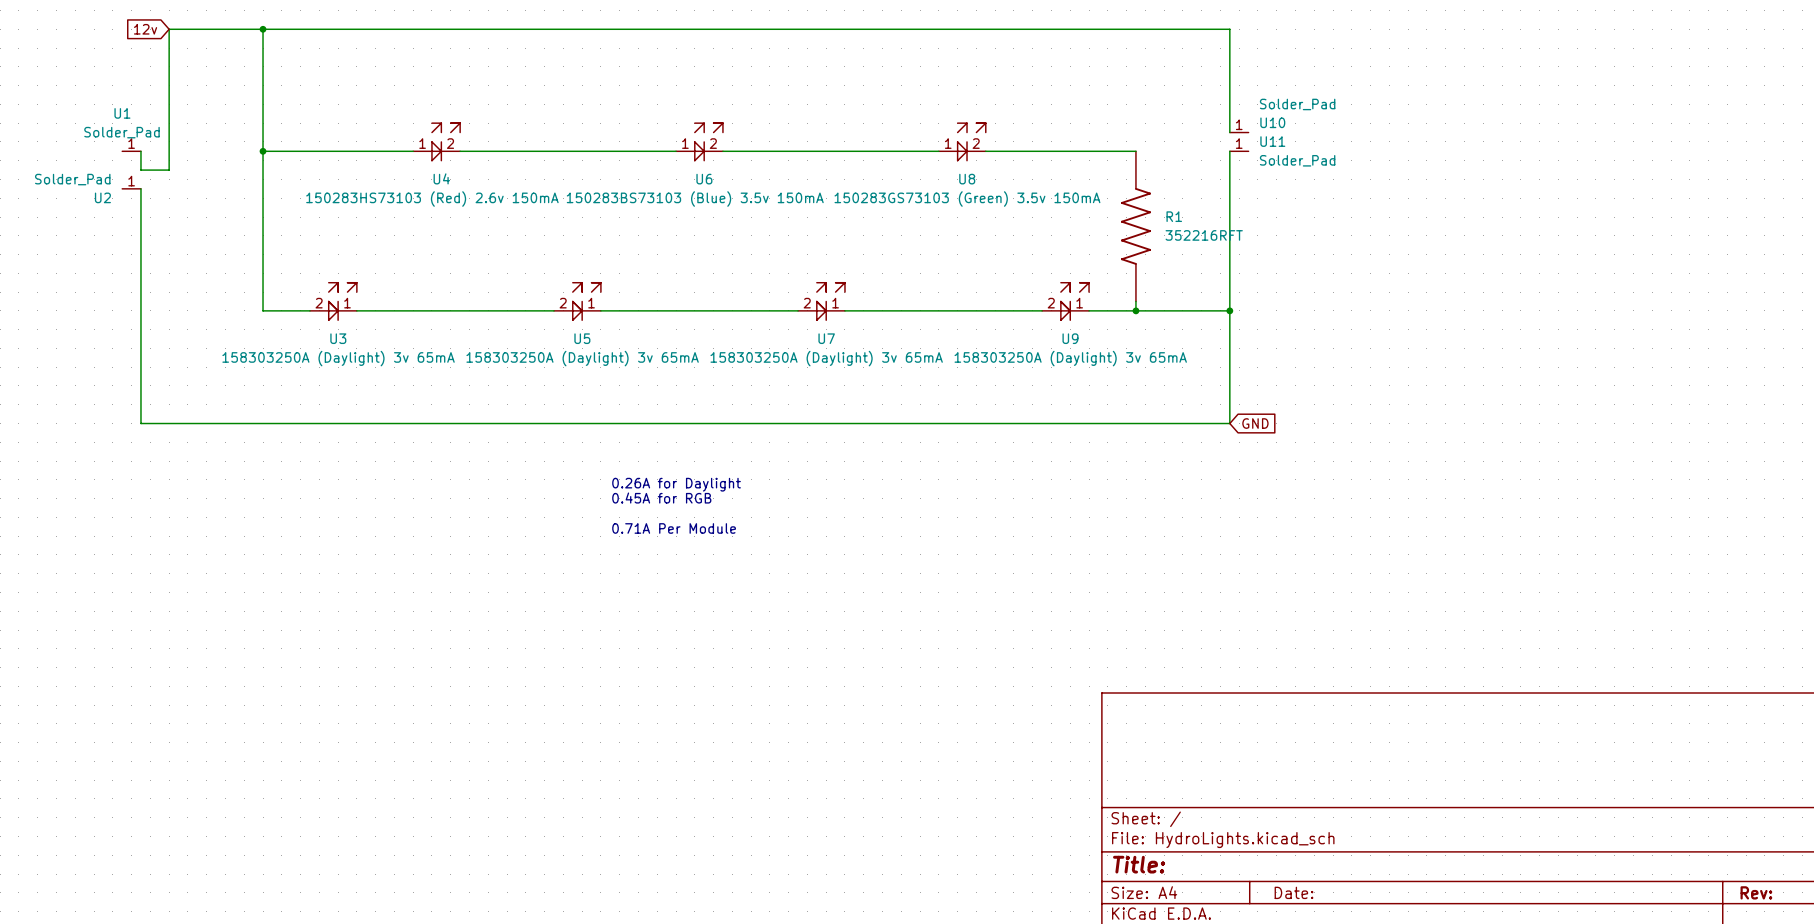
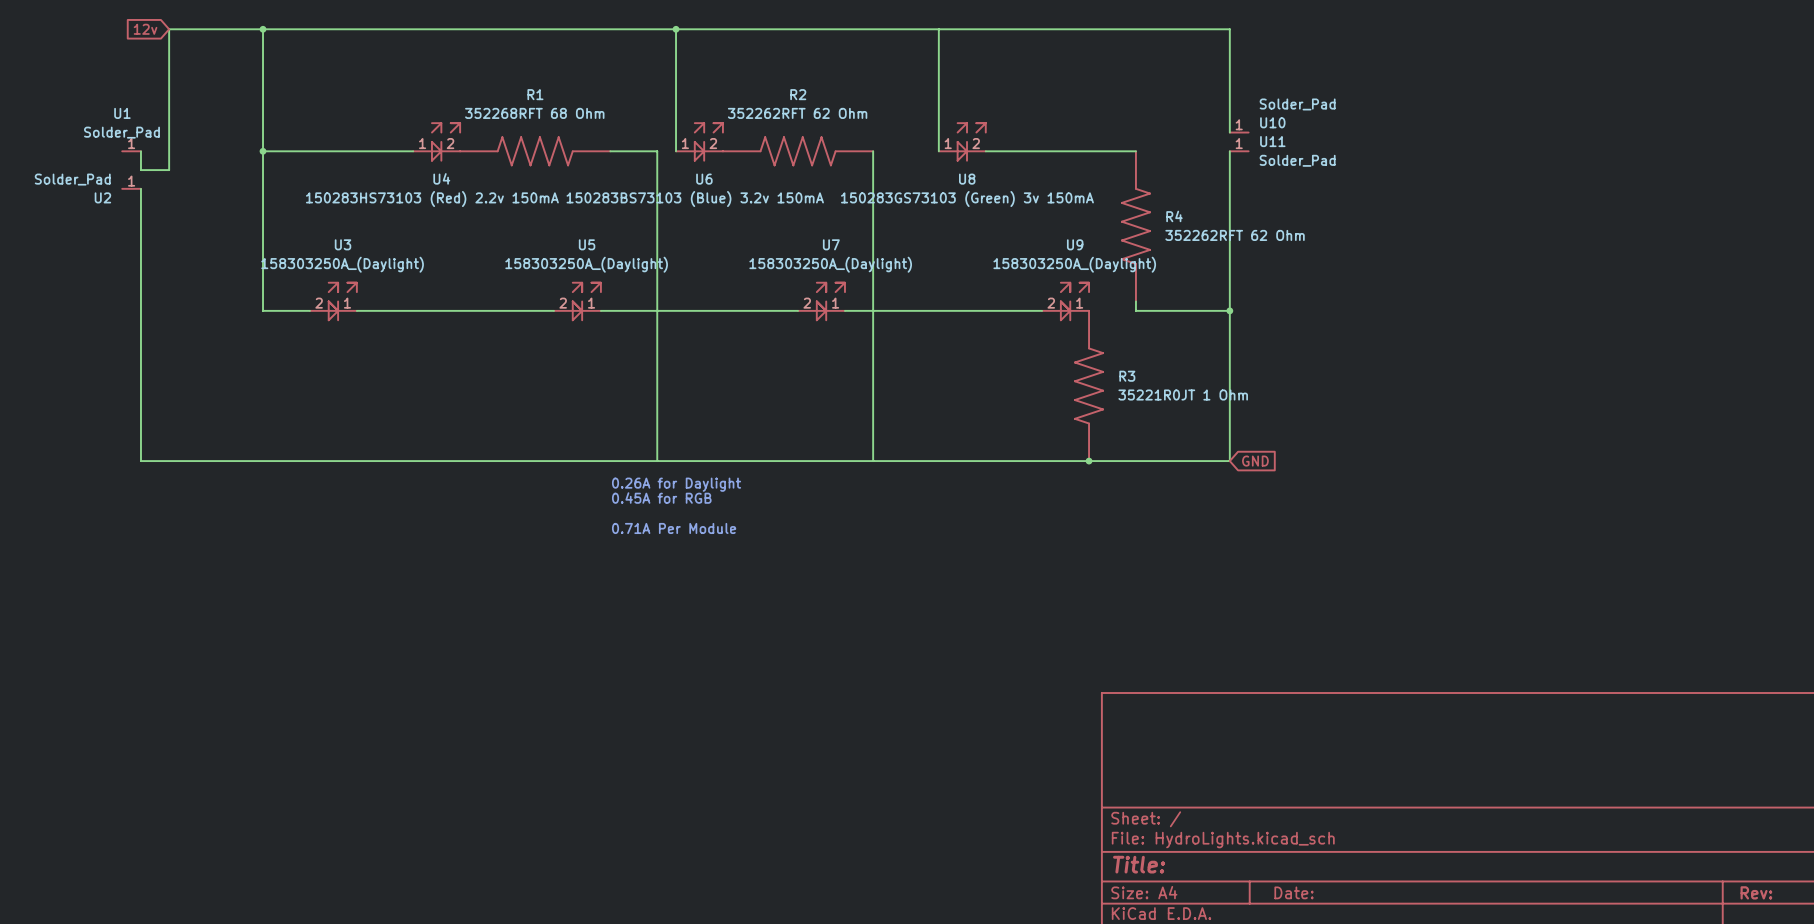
junction: none -> (676, 29)
R1: none -> 352268RFT 68 Ohm (535, 151)
wire: (657, 151) (676, 151) -> (676, 29) (676, 151)
wire: none -> (657, 151) (657, 461)
wire: (722, 151) (938, 151) -> (938, 29) (938, 151)
R2: none -> 352262RFT 62 Ohm (798, 151)
wire: none -> (873, 151) (873, 461)
U4 value: 150283HS73103 (Red) 2.6v 150mA (432, 199) -> 150283HS73103 (Red) 2.2v 150mA (432, 199)
U6 value: 150283BS73103 (Blue) 3.5v 150mA (695, 199) -> 150283BS73103 (Blue) 3.2v 150mA (695, 199)
U8 value: 150283GS73103 (Green) 3.5v 150mA (967, 199) -> 150283GS73103 (Green) 3v 150mA (967, 199)
R1 name: R1 (1174, 216) -> R4 (1174, 216)
R1 value: 352216RFT (1204, 235) -> 352262RFT 62 Ohm (1235, 235)
wire: (1089, 310) (1135, 310) -> none
junction: (1135, 310) -> none
U3 name position: U3 (338, 338) -> U3 (343, 244)
U5 name position: U5 (582, 338) -> U5 (587, 244)
U7 name position: U7 (826, 338) -> U7 (831, 244)
U9 name position: U9 (1070, 338) -> U9 (1075, 244)
U3 value: 158303250A (Daylight) 3v 65mA (338, 358) -> 158303250A_(Daylight) (342, 264)
U5 value: 158303250A (Daylight) 3v 65mA (582, 358) -> 158303250A_(Daylight) (586, 264)
U7 value: 158303250A (Daylight) 3v 65mA (826, 358) -> 158303250A_(Daylight) (830, 264)
U9 value: 158303250A (Daylight) 3v 65mA (1070, 358) -> 158303250A_(Daylight) (1074, 264)
R3: none -> 35221R0JT 1 Ohm (1089, 385)
wire: (140, 423) (1229, 423) -> (140, 423) (140, 461) (1229, 461) (1229, 423)
global label position: GND (1255, 423) -> GND (1255, 461)
junction: none -> (1089, 461)

